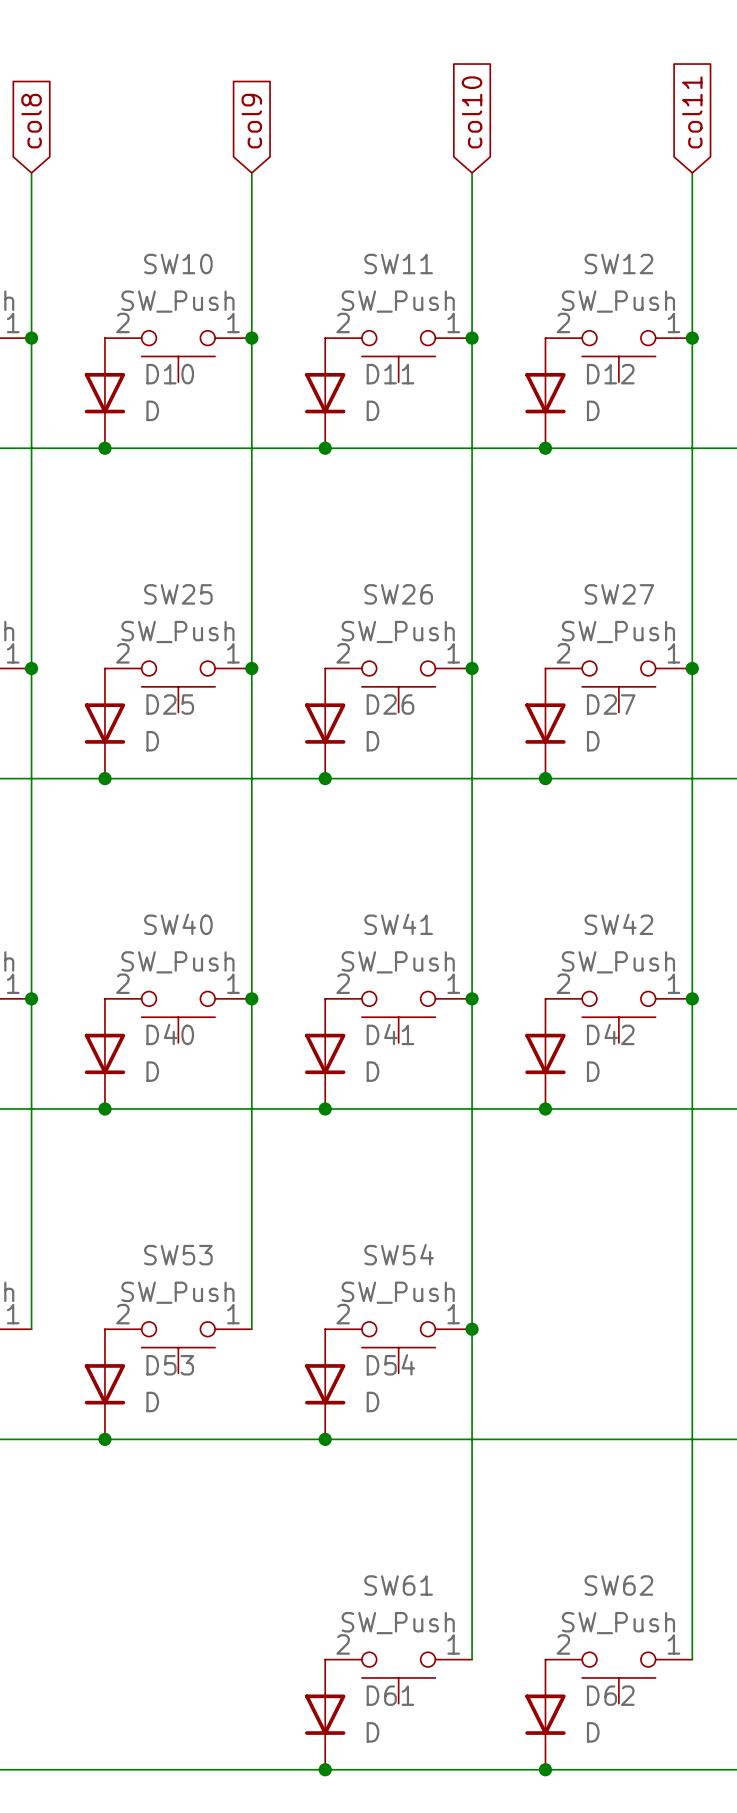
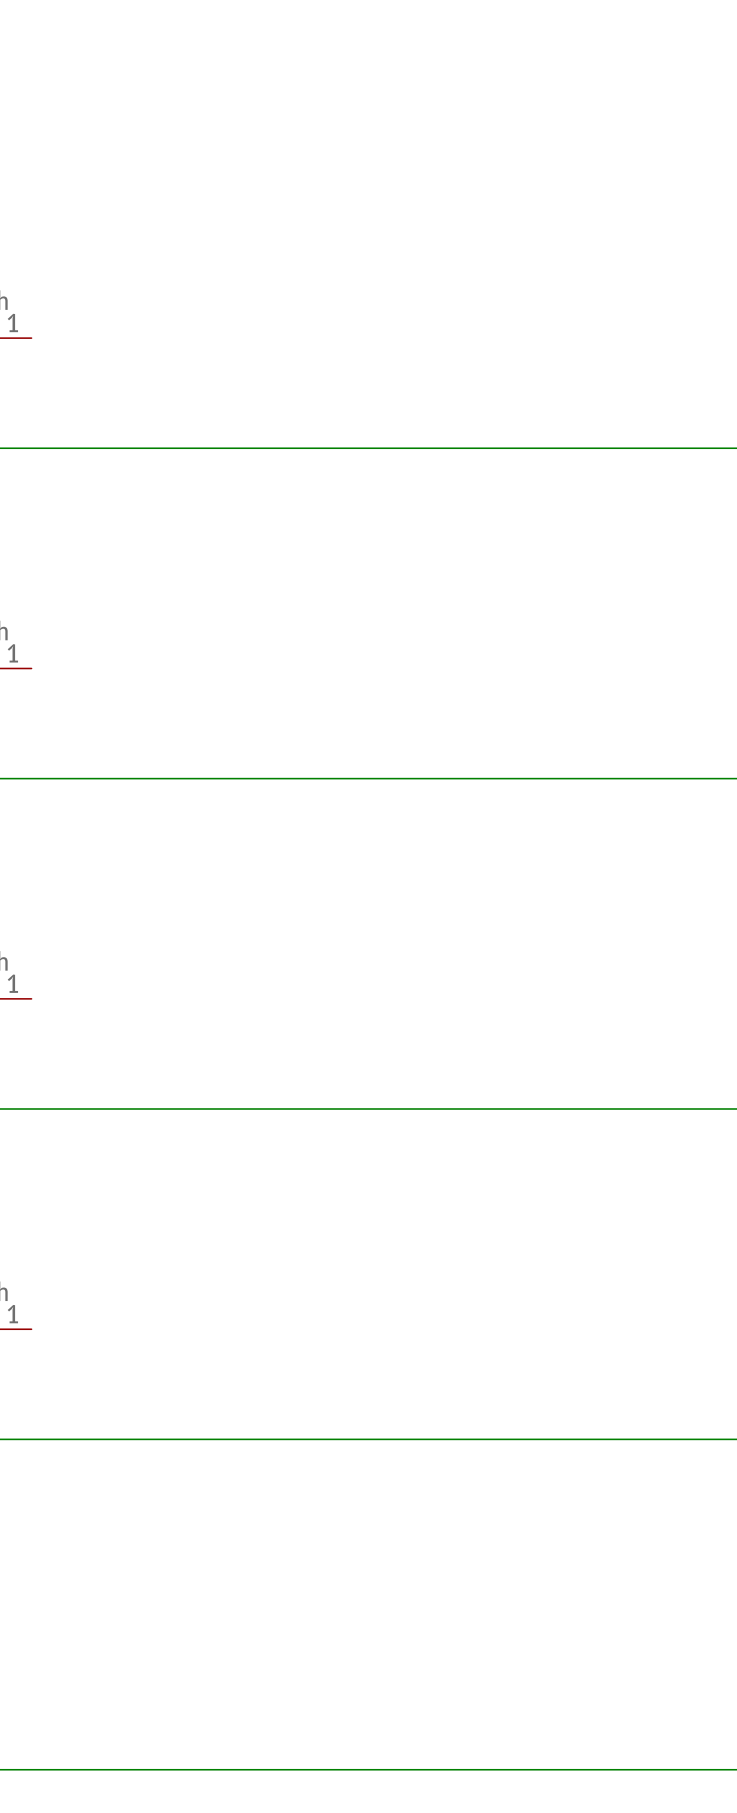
global label: col10 (472, 112) -> none
global label: col11 (692, 112) -> none
global label: col8 (31, 121) -> none
global label: col9 (251, 121) -> none
wire: (31, 172) (31, 1329) -> none
wire: (251, 172) (251, 1329) -> none
wire: (472, 172) (472, 1659) -> none
wire: (692, 172) (692, 1659) -> none
junction: (31, 338) -> none
junction: (251, 338) -> none
junction: (472, 338) -> none
junction: (692, 338) -> none
SW10: SW_Push (178, 356) -> none
SW11: SW_Push (398, 356) -> none
SW12: SW_Push (618, 356) -> none
D10: D (104, 393) -> none
D11: D (325, 393) -> none
D12: D (545, 393) -> none
junction: (104, 448) -> none
junction: (325, 448) -> none
junction: (545, 448) -> none
junction: (31, 668) -> none
junction: (251, 668) -> none
junction: (472, 668) -> none
junction: (692, 668) -> none
SW25: SW_Push (178, 686) -> none
SW26: SW_Push (398, 686) -> none
SW27: SW_Push (618, 686) -> none
D25: D (104, 723) -> none
D26: D (325, 723) -> none
D27: D (545, 723) -> none
junction: (104, 778) -> none
junction: (325, 778) -> none
junction: (545, 778) -> none
junction: (31, 998) -> none
junction: (251, 998) -> none
junction: (472, 998) -> none
junction: (692, 998) -> none
SW40: SW_Push (178, 1017) -> none
SW41: SW_Push (398, 1017) -> none
SW42: SW_Push (618, 1017) -> none
D40: D (104, 1053) -> none
D41: D (325, 1053) -> none
D42: D (545, 1053) -> none
junction: (104, 1108) -> none
junction: (325, 1108) -> none
junction: (545, 1108) -> none
junction: (472, 1329) -> none
SW53: SW_Push (178, 1347) -> none
SW54: SW_Push (398, 1347) -> none
D53: D (104, 1384) -> none
D54: D (325, 1384) -> none
junction: (104, 1439) -> none
junction: (325, 1439) -> none
SW61: SW_Push (398, 1677) -> none
SW62: SW_Push (618, 1677) -> none
D61: D (325, 1714) -> none
D62: D (545, 1714) -> none
junction: (325, 1769) -> none
junction: (545, 1769) -> none

